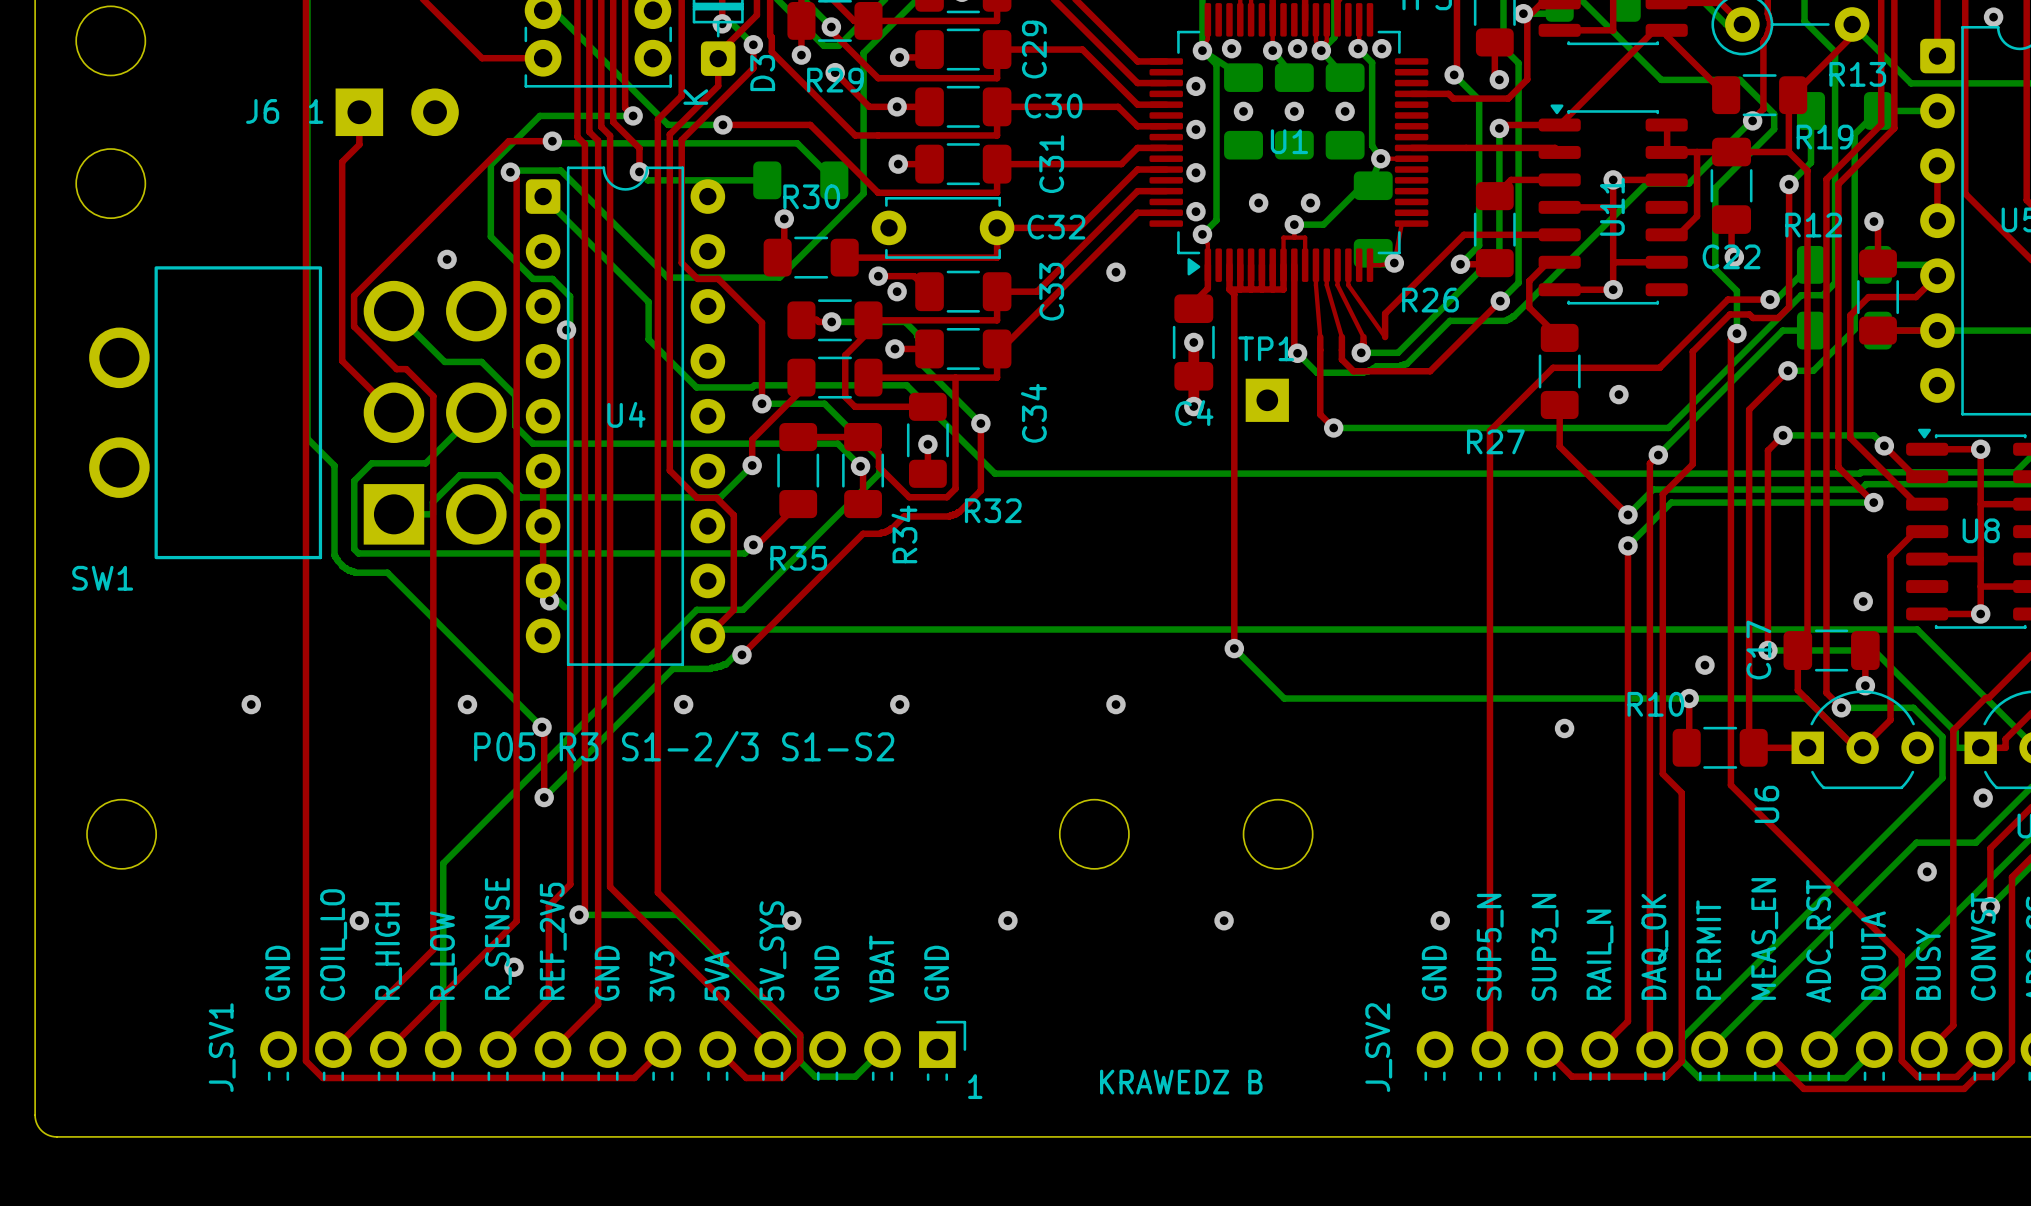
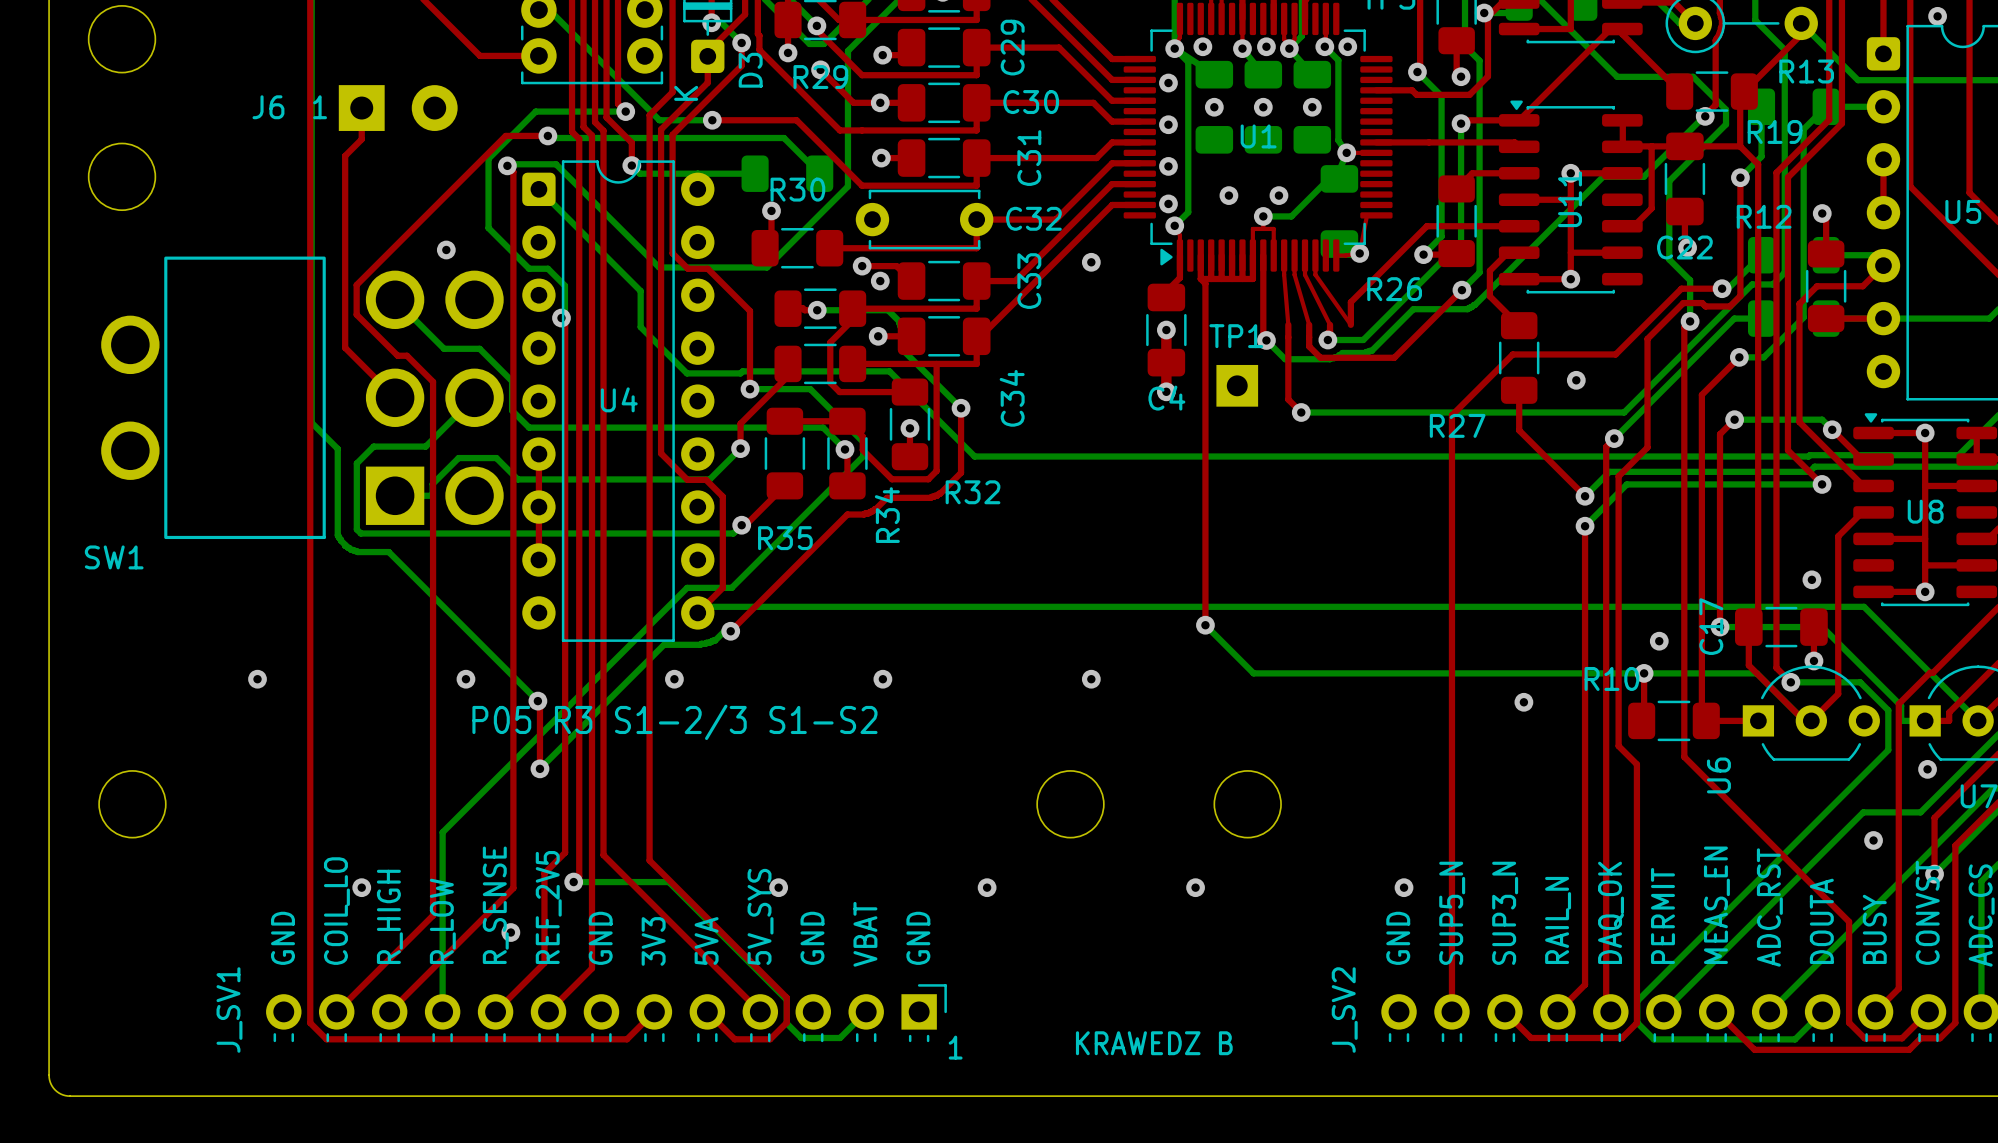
bottom track: (549, 600) (558, 600) (564, 607) -> none
via: (549, 600) -> none

